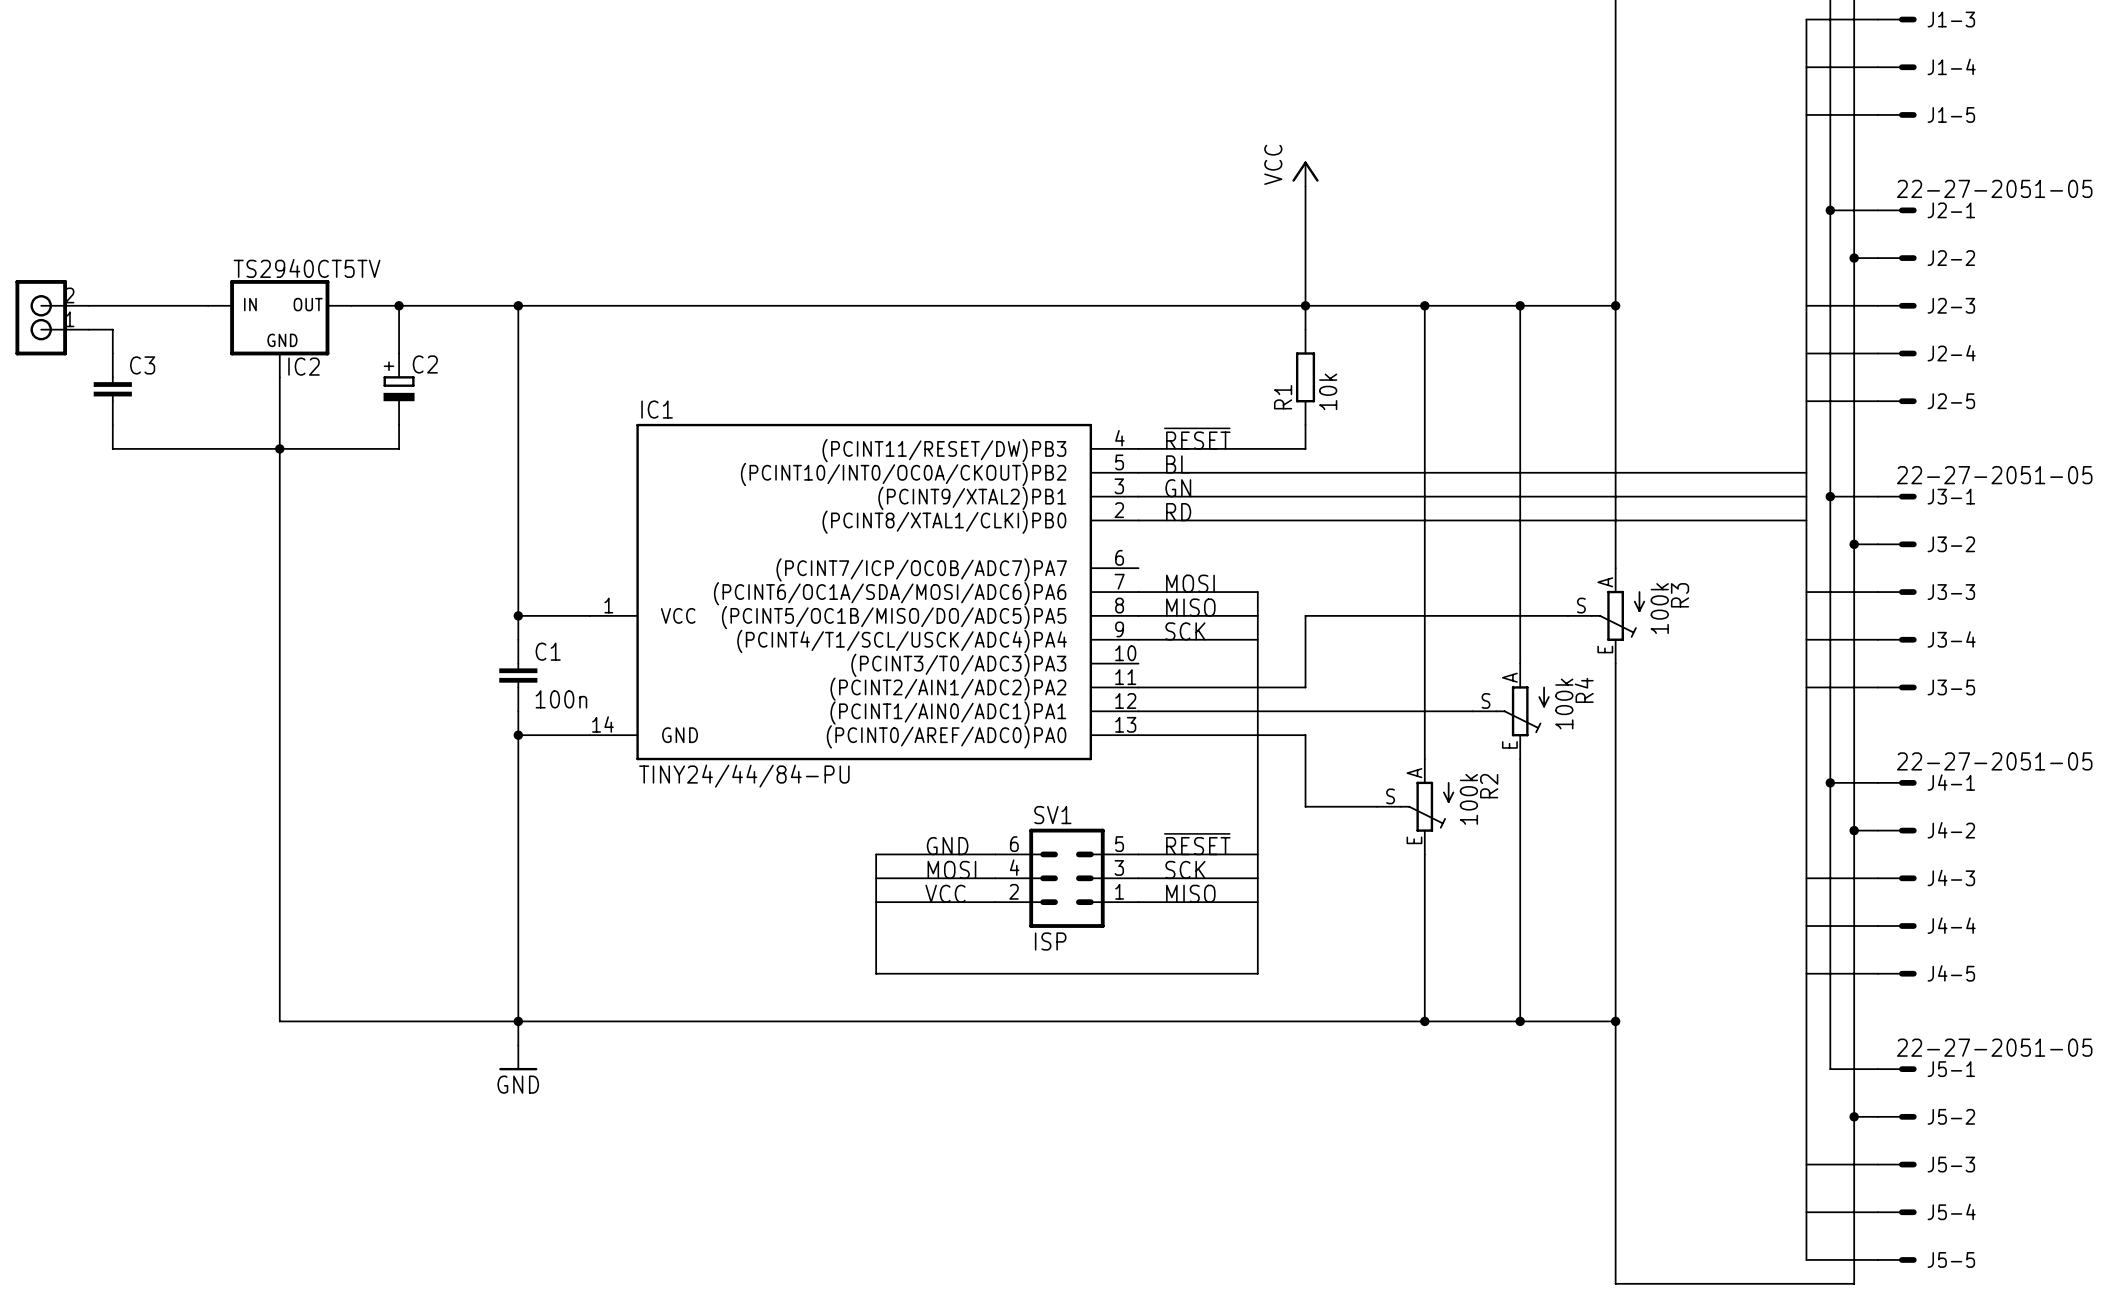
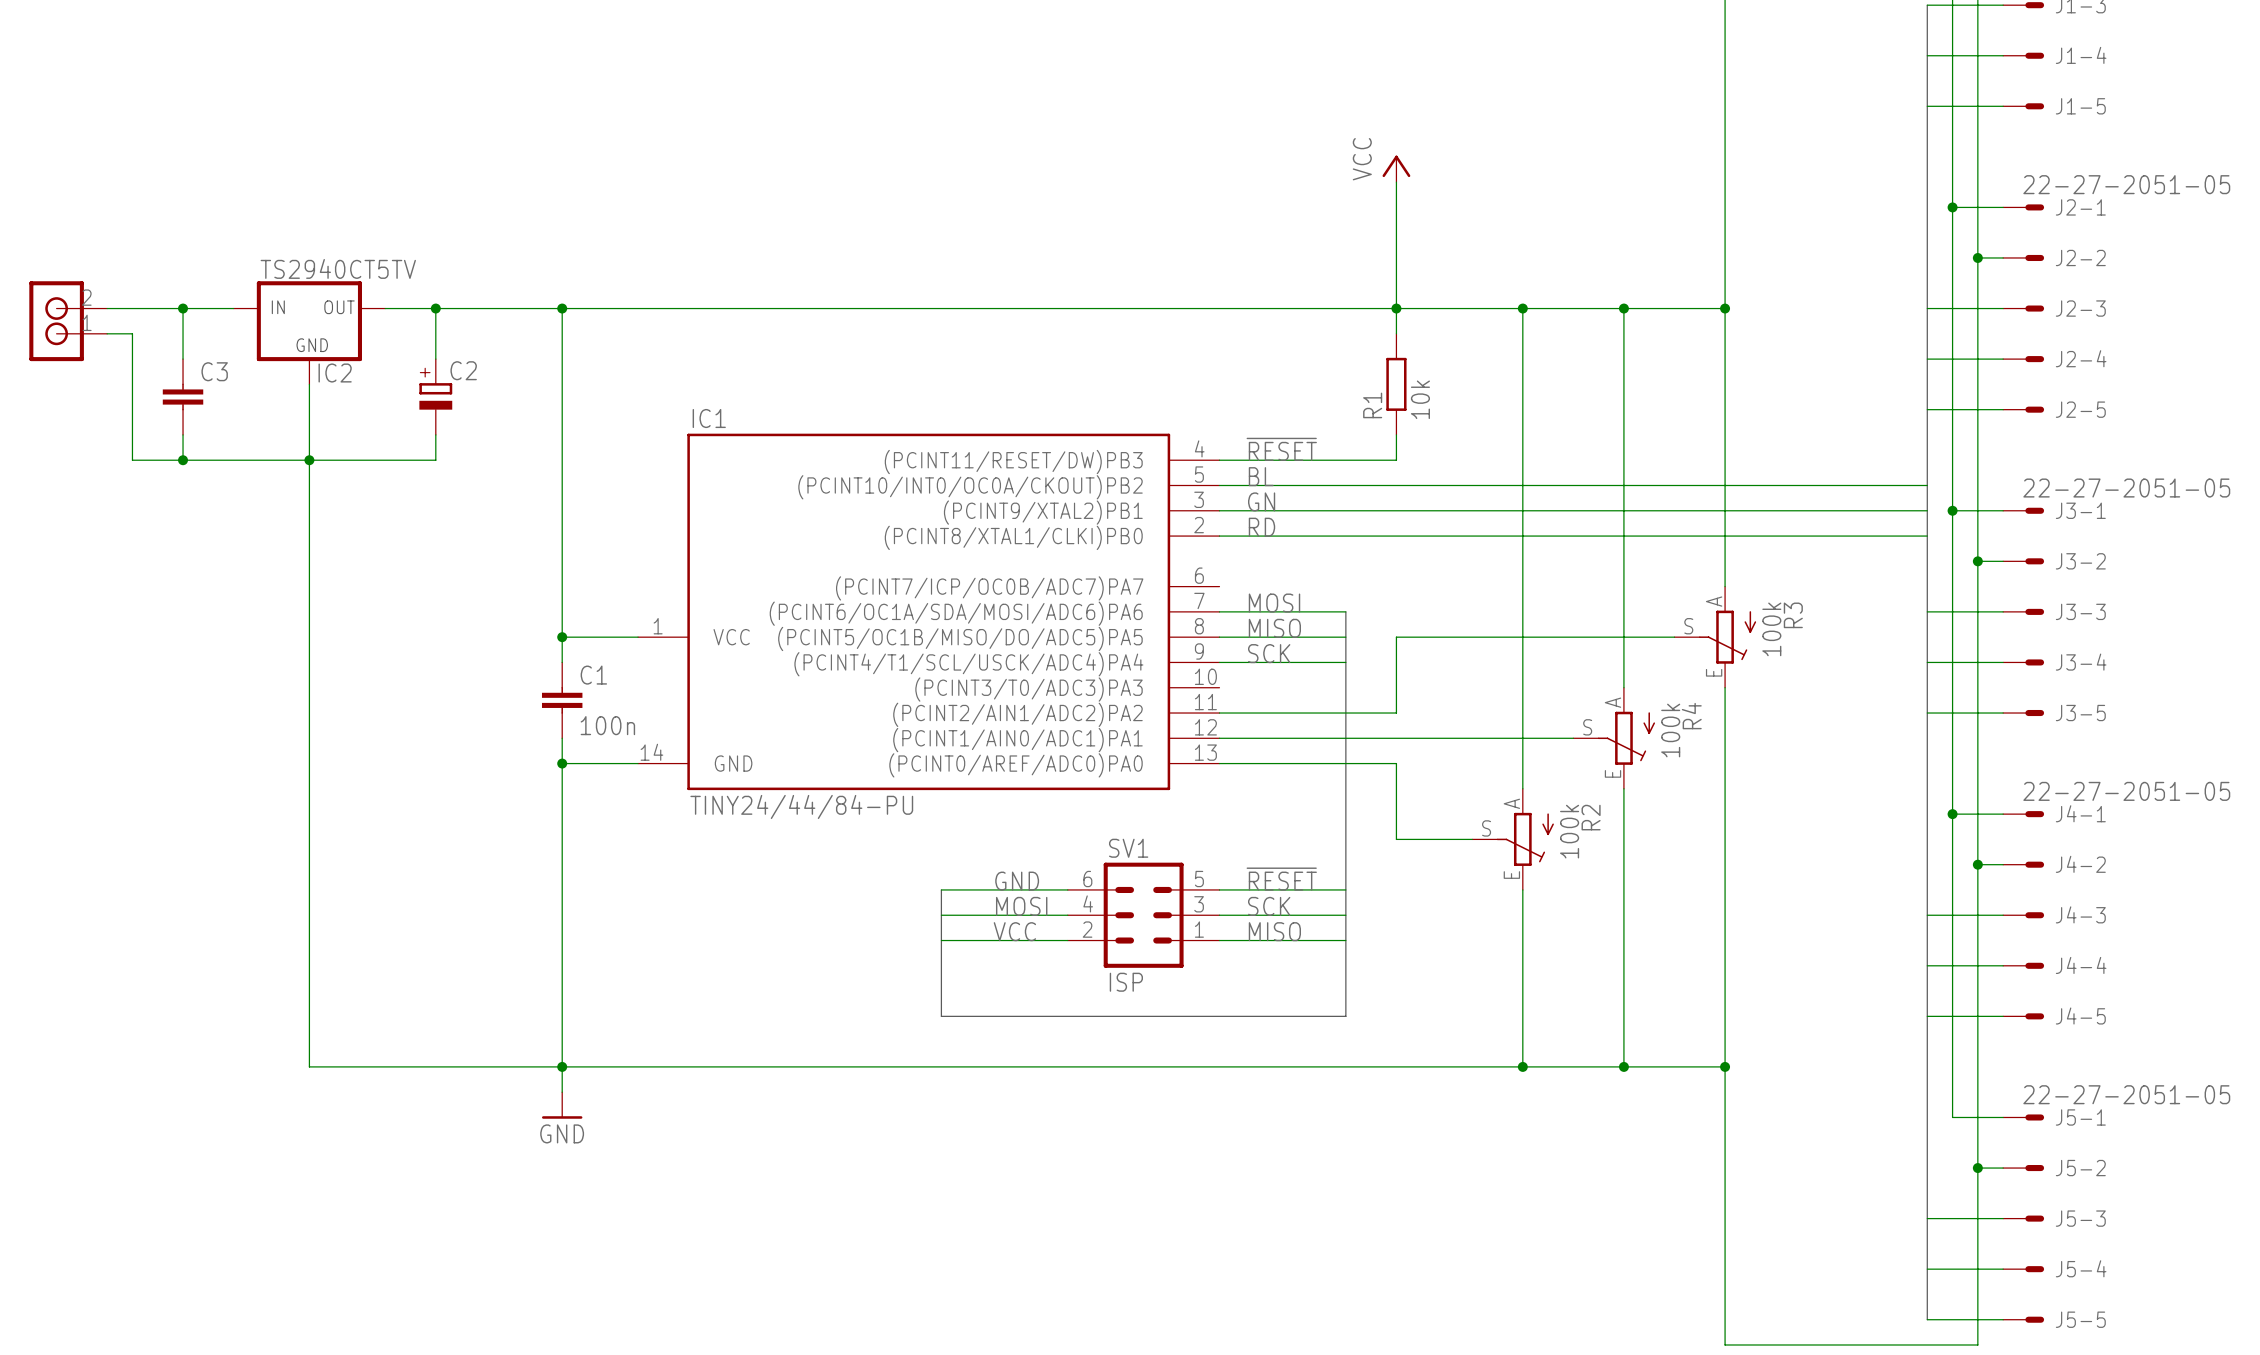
wire: none -> (183, 308) (183, 359)
junction: none -> (183, 308)
C3 position: (112, 389) -> (183, 397)
wire: none -> (183, 434) (183, 460)
junction: none -> (183, 460)

